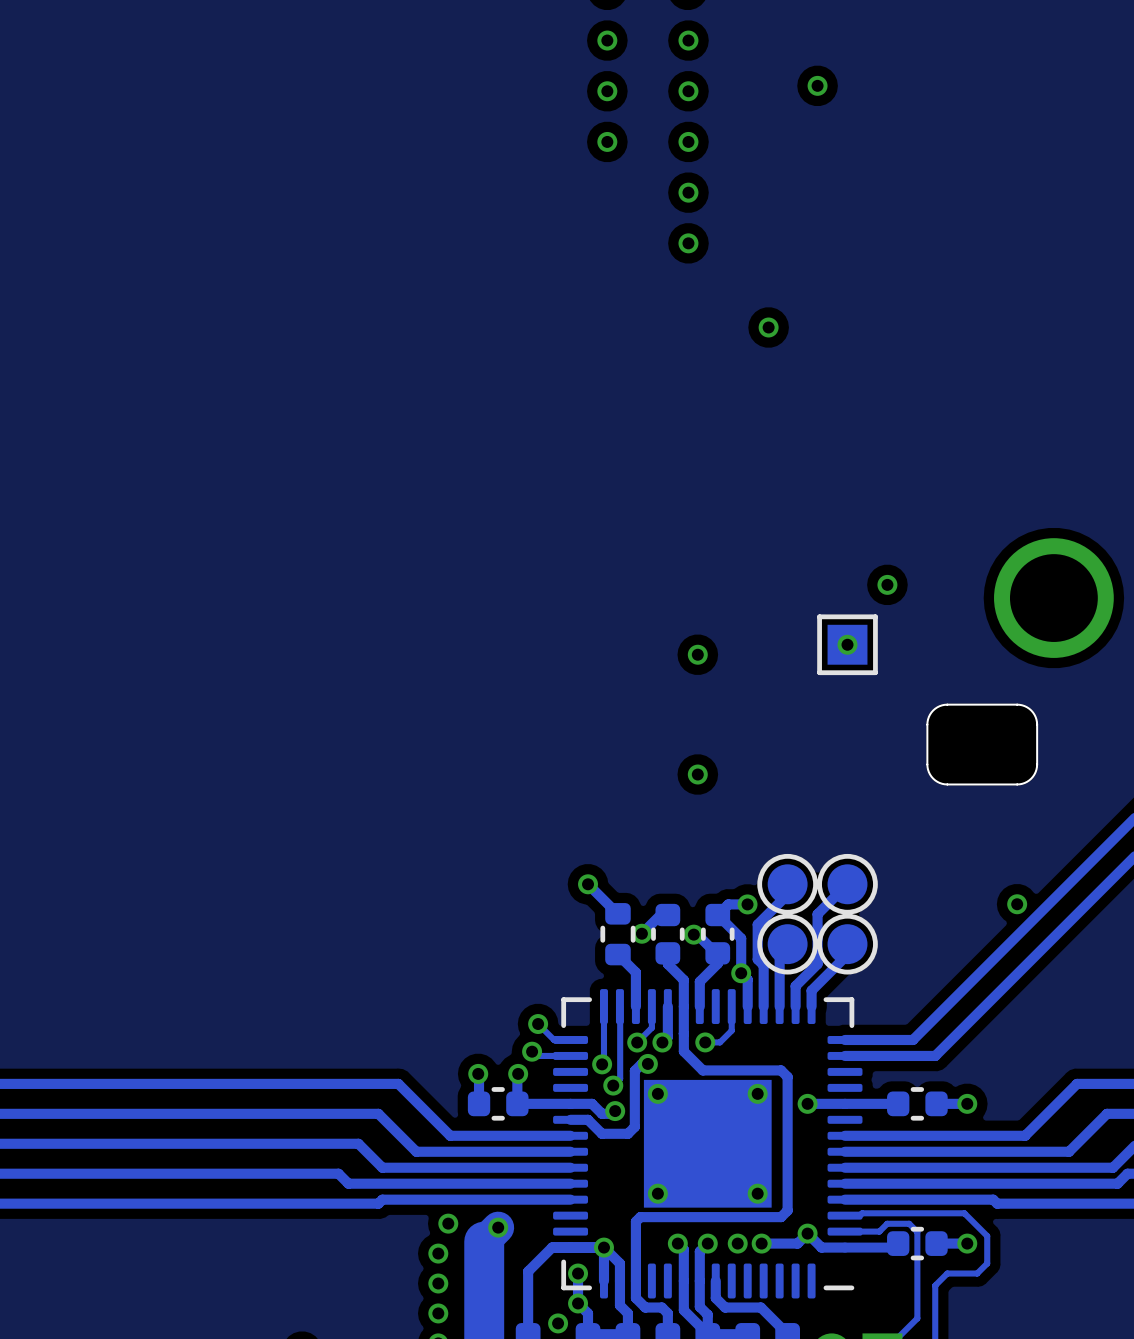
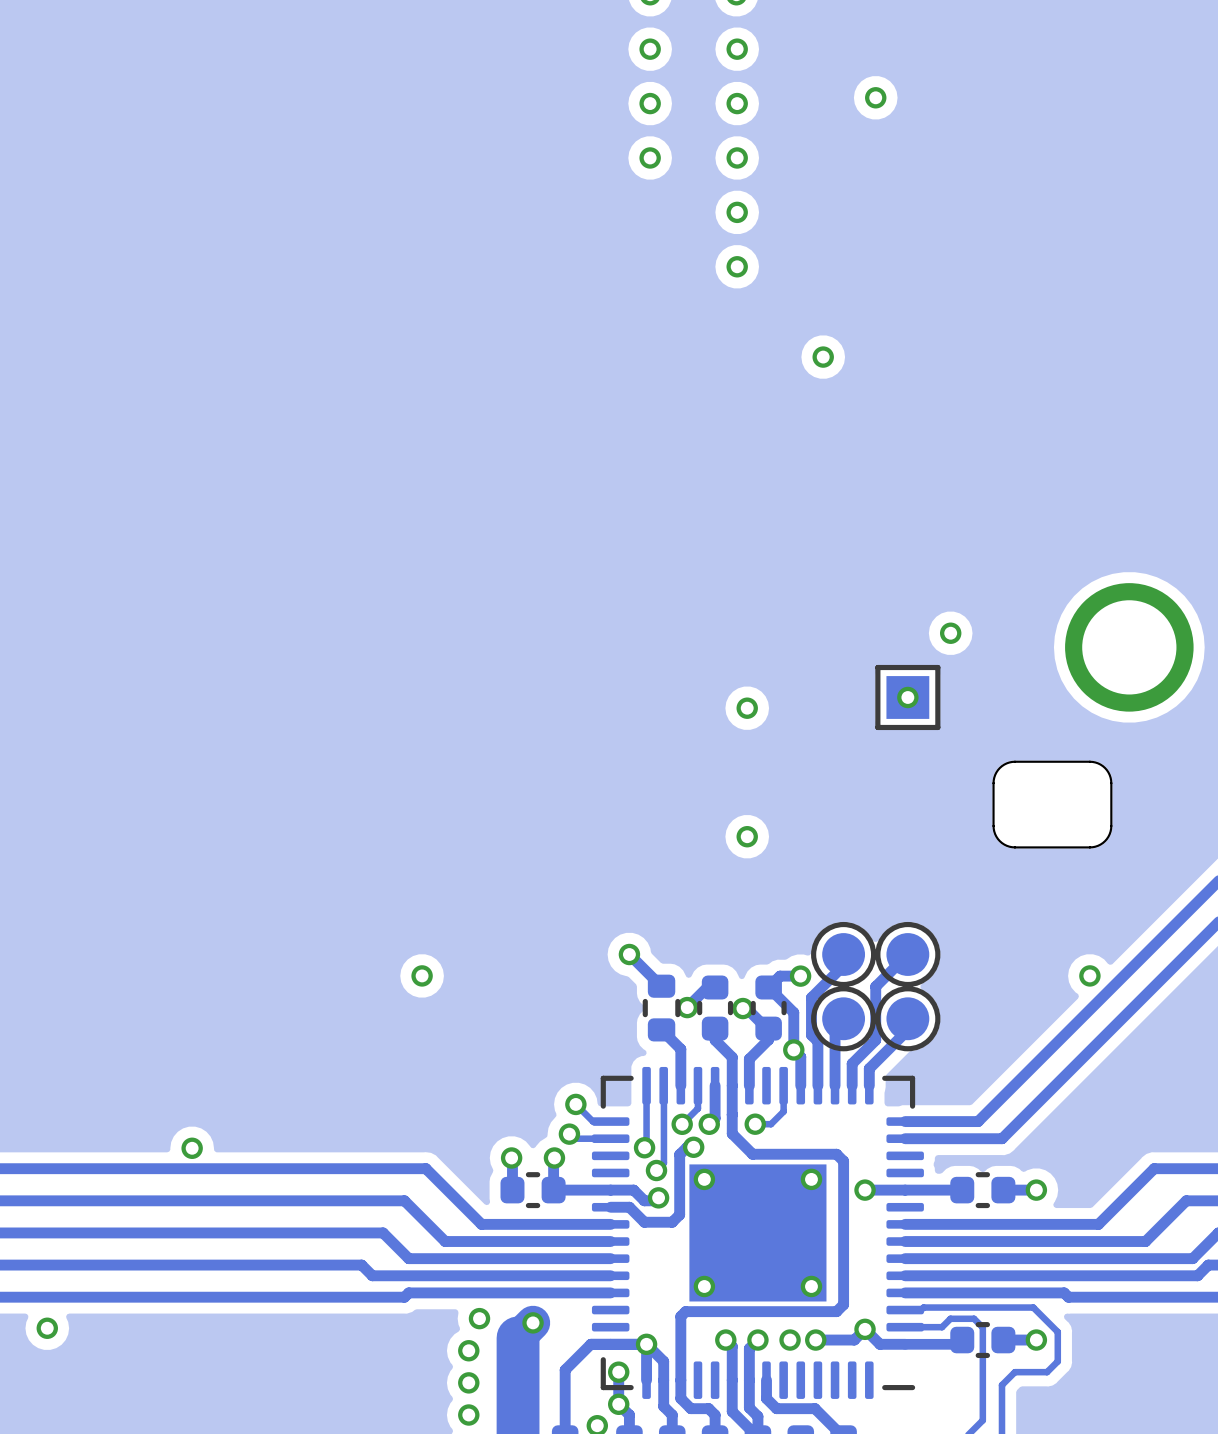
via: none -> (422, 975)
via: none -> (192, 1148)
via: none -> (47, 1328)

